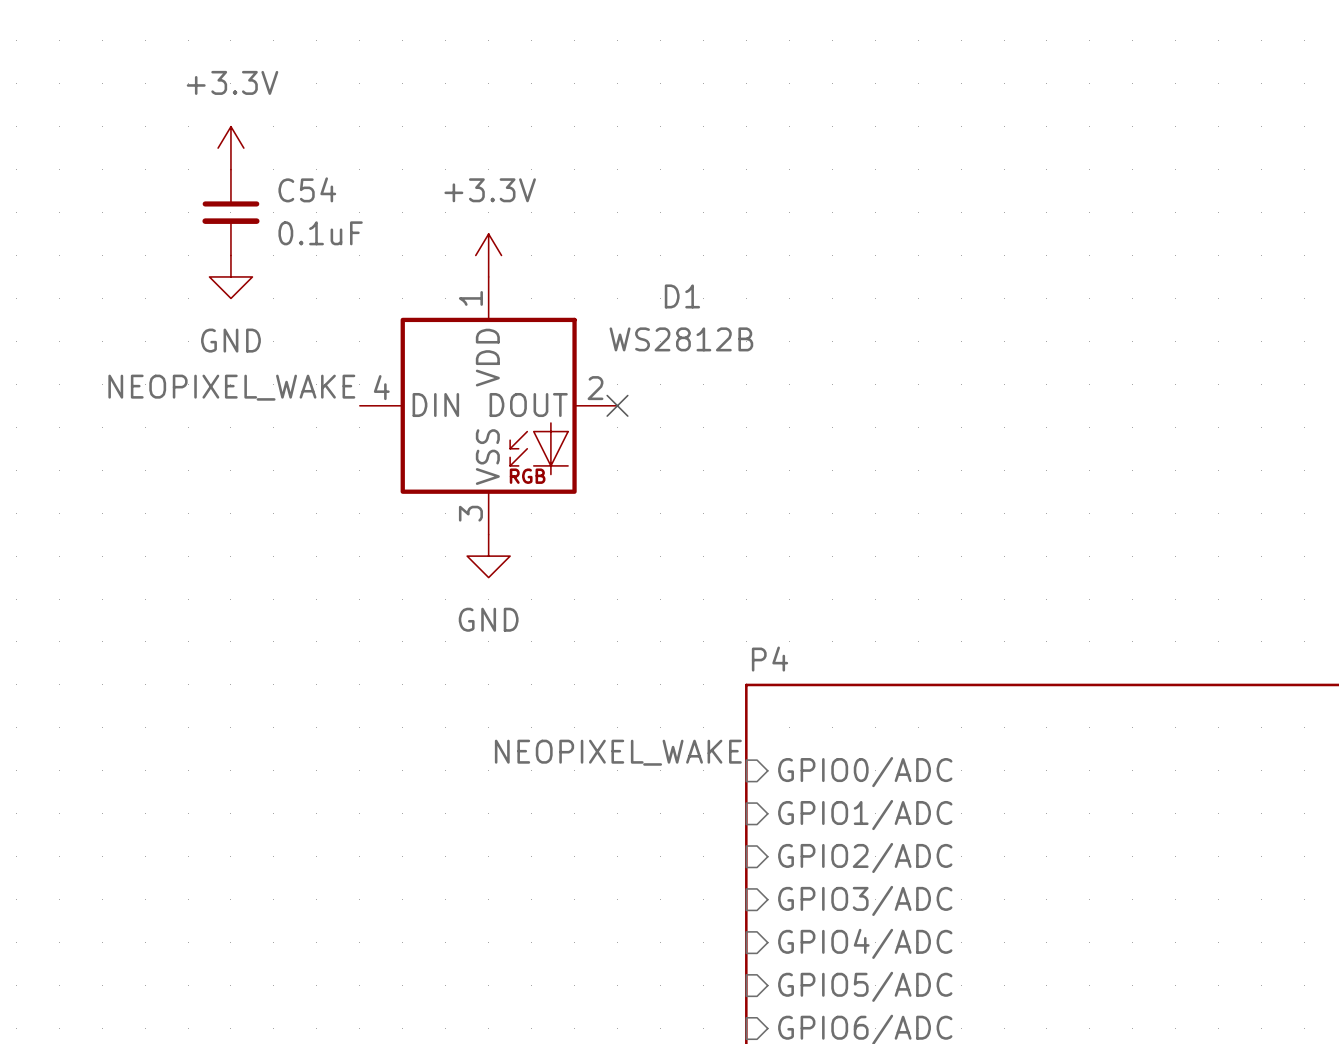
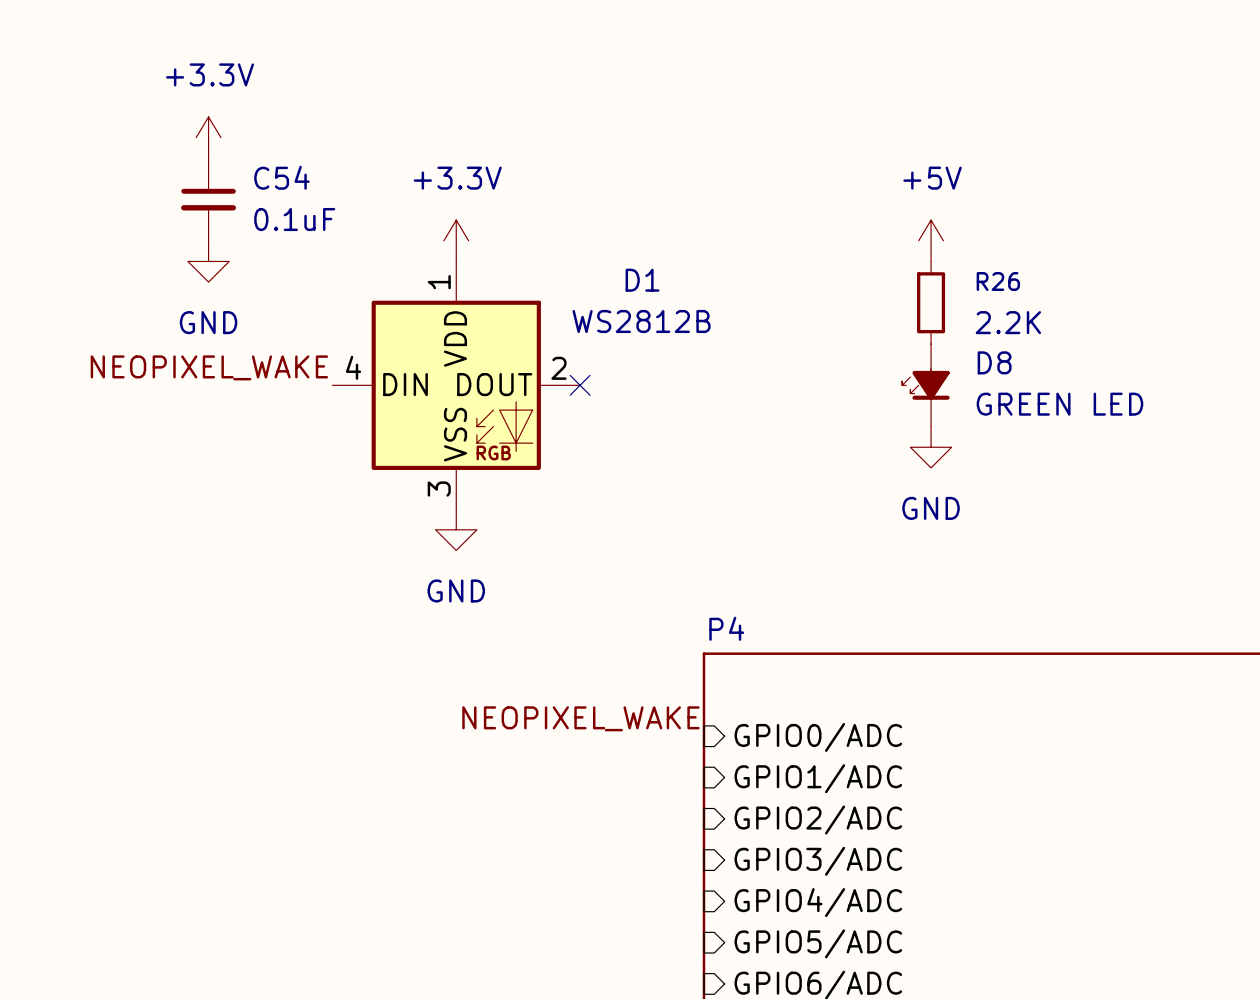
power symbol: none -> +5V (931, 240)
R26: none -> 2.2K (931, 302)
D8: none -> GREEN LED (925, 385)
power symbol: none -> GND (931, 447)

